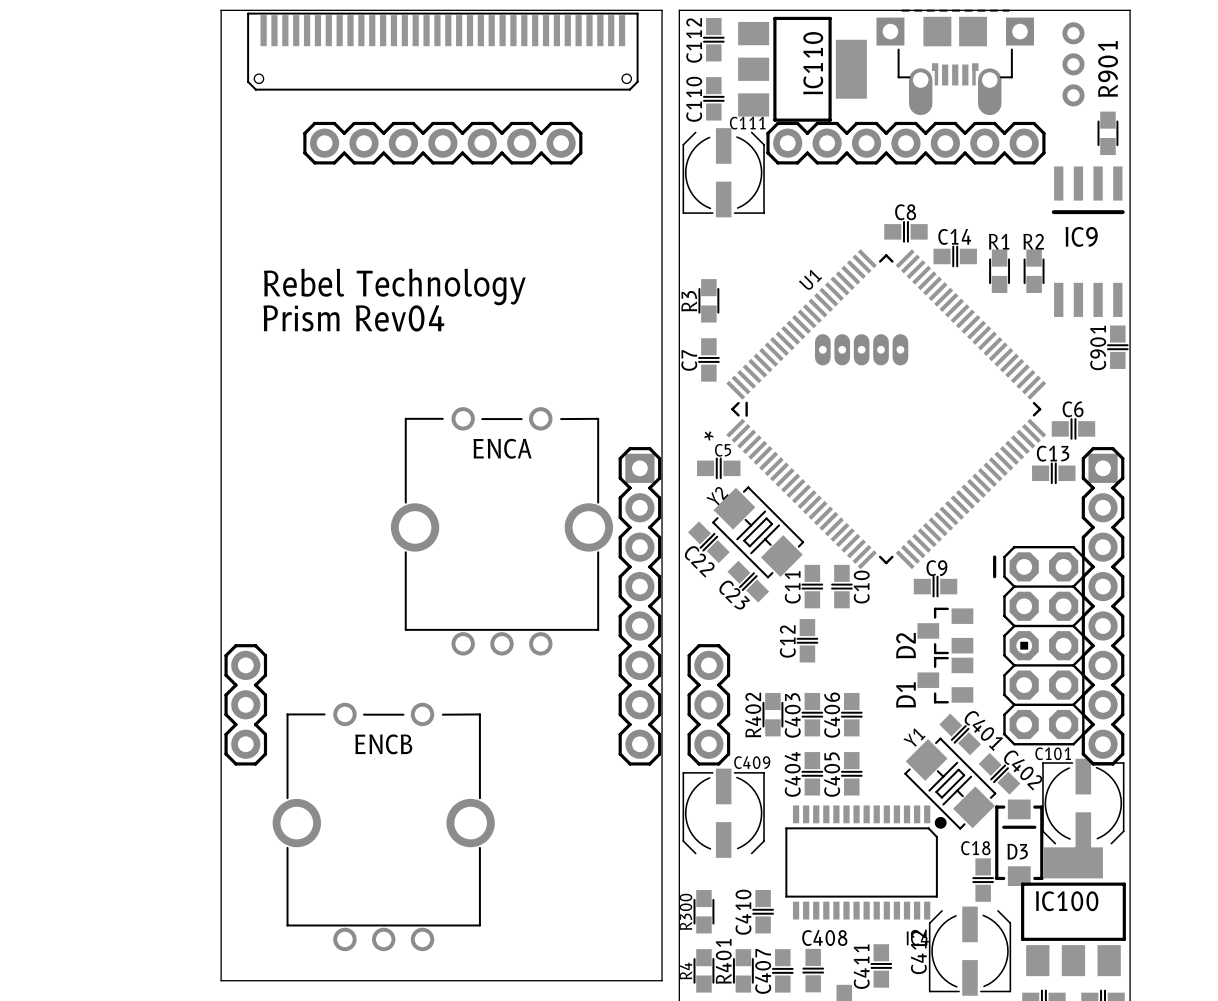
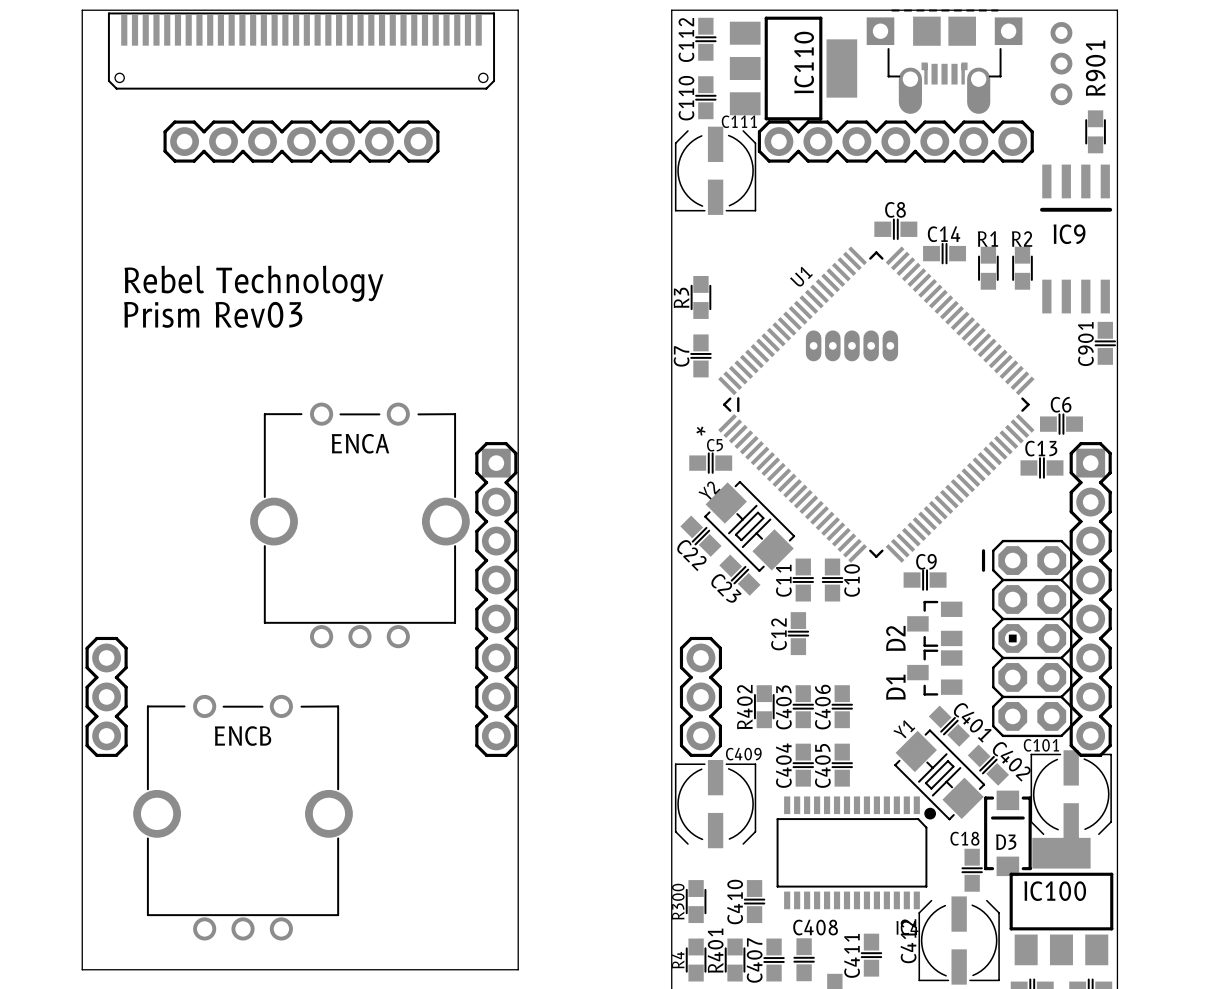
board edge: (221, 10) (221, 980) -> (218, 10) (82, 10) (82, 969) (218, 969)
board edge: (524, 10) (662, 10) (662, 980) (524, 980) -> (518, 10) (518, 969)
part position: (442, 51) -> (301, 51)
part position: (442, 143) -> (301, 141)
text position: Rebel Technology (394, 286) -> Rebel Technology (253, 283)
text: Prism Rev04 (353, 318) -> Prism Rev03 (213, 314)
ENCA position: (501, 531) -> (359, 525)
part position: (639, 606) -> (496, 599)
part position: (245, 704) -> (106, 696)
ENCB position: (383, 826) -> (243, 817)

